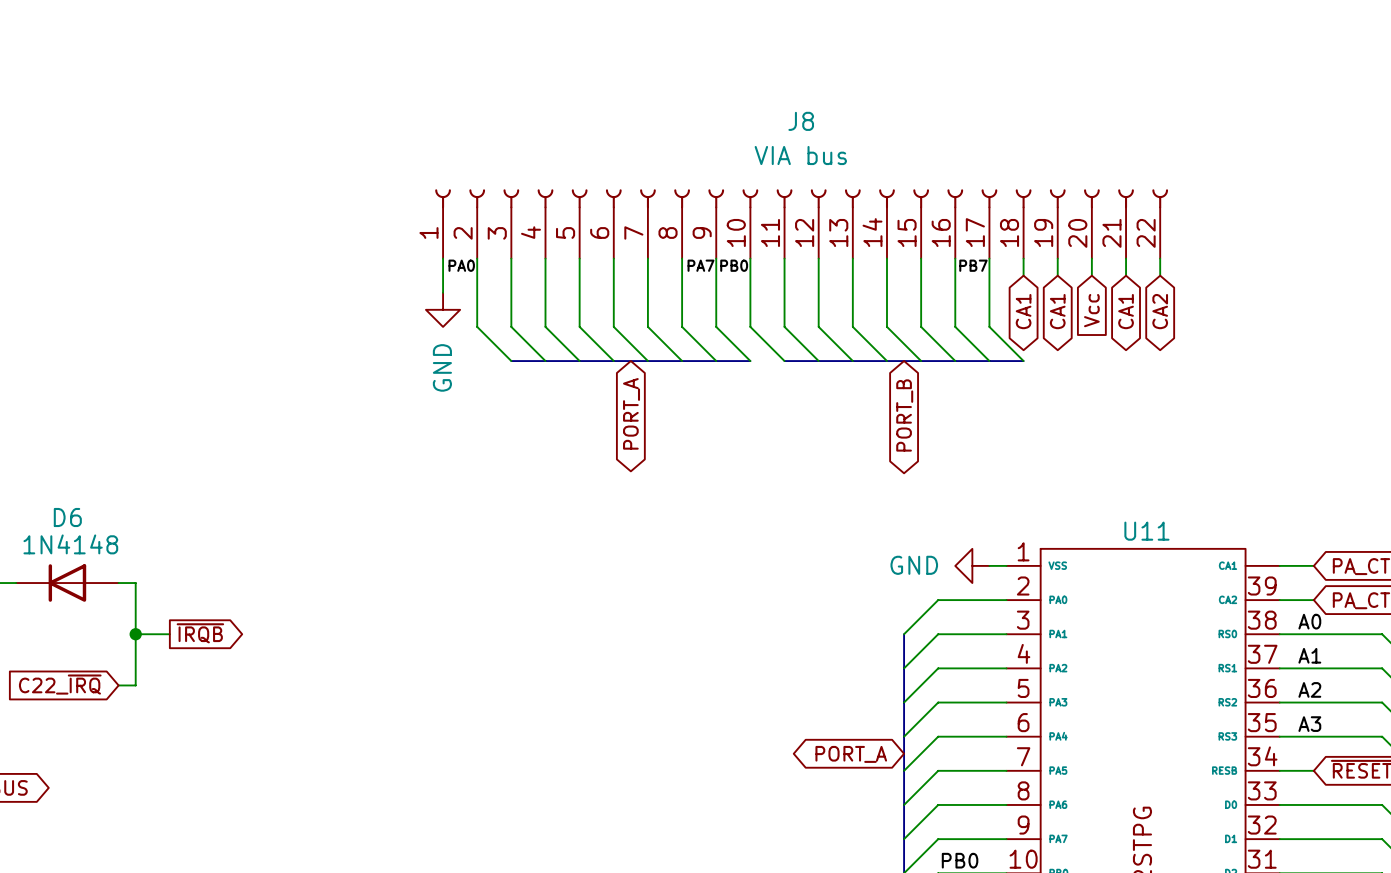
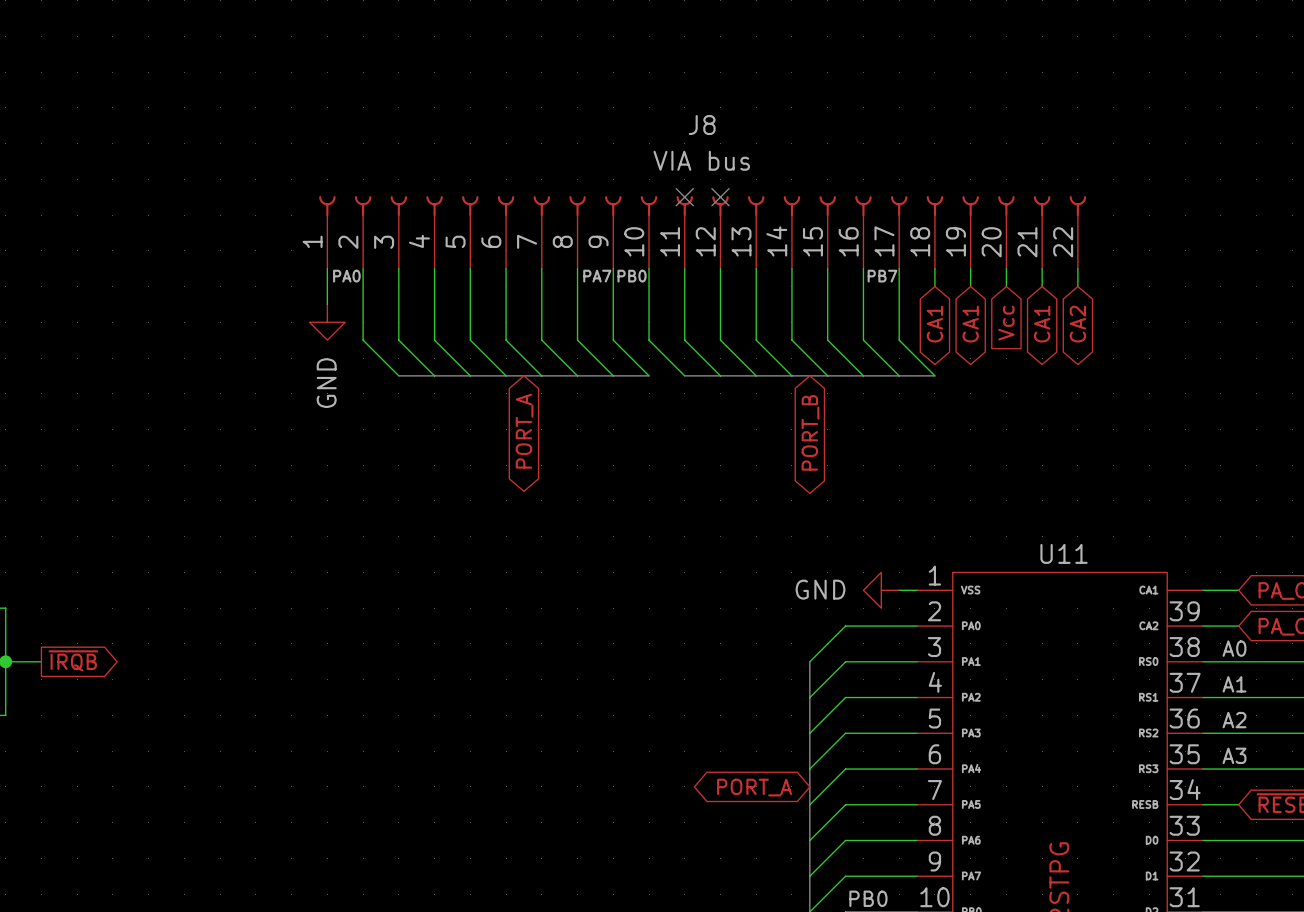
no-connect mark: none -> (684, 197)
no-connect mark: none -> (720, 197)

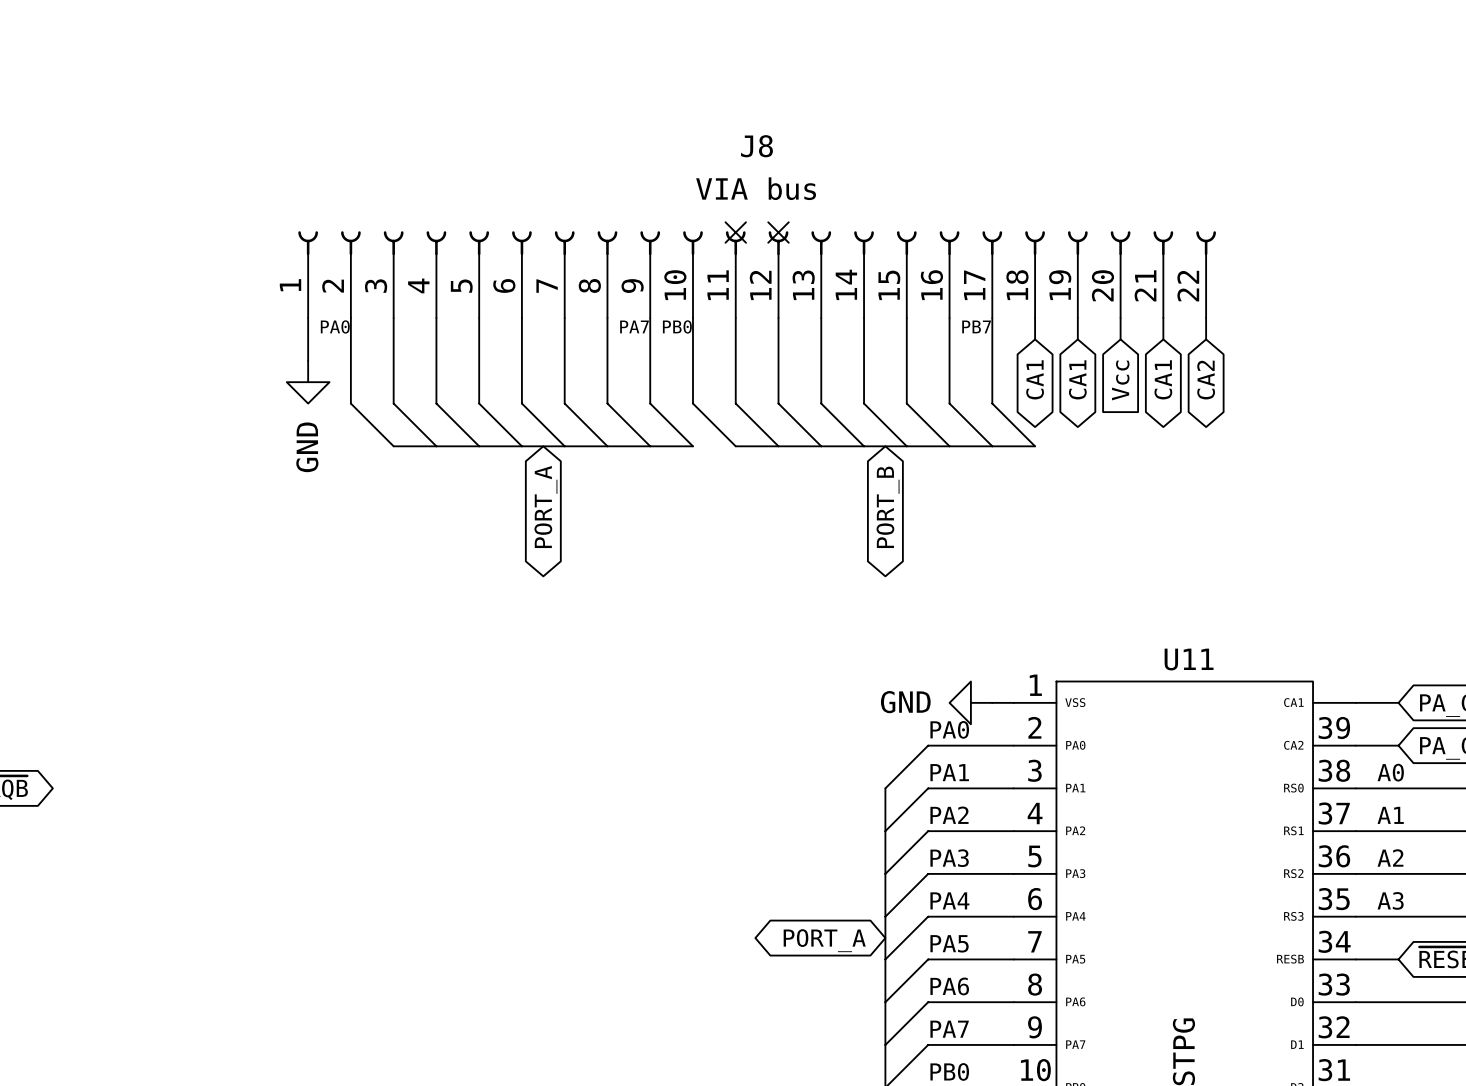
label: none -> PA0 (949, 729)
label: none -> PA1 (949, 772)
label: none -> PA2 (949, 815)
label: none -> PA3 (949, 858)
label: none -> PA4 (949, 900)
label: none -> PA5 (949, 943)
label: none -> PA6 (949, 986)
label: none -> PA7 (949, 1029)

